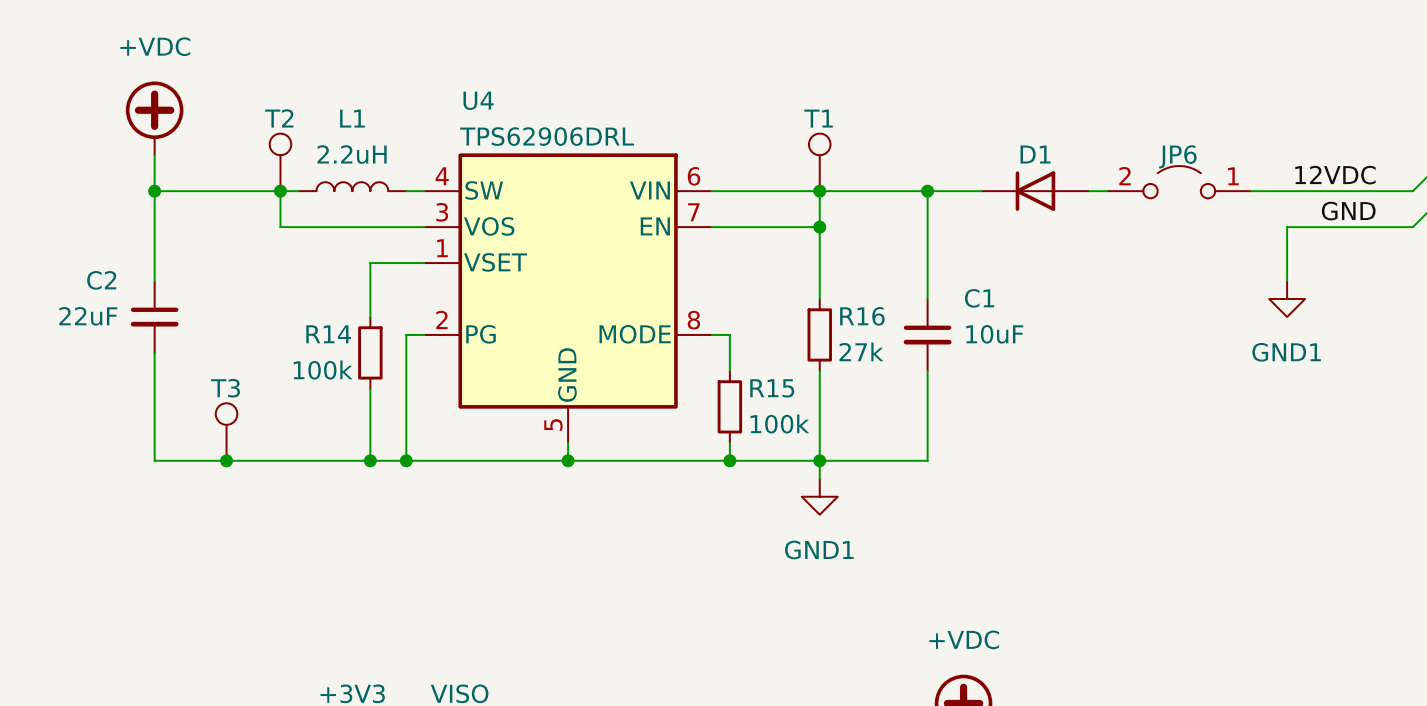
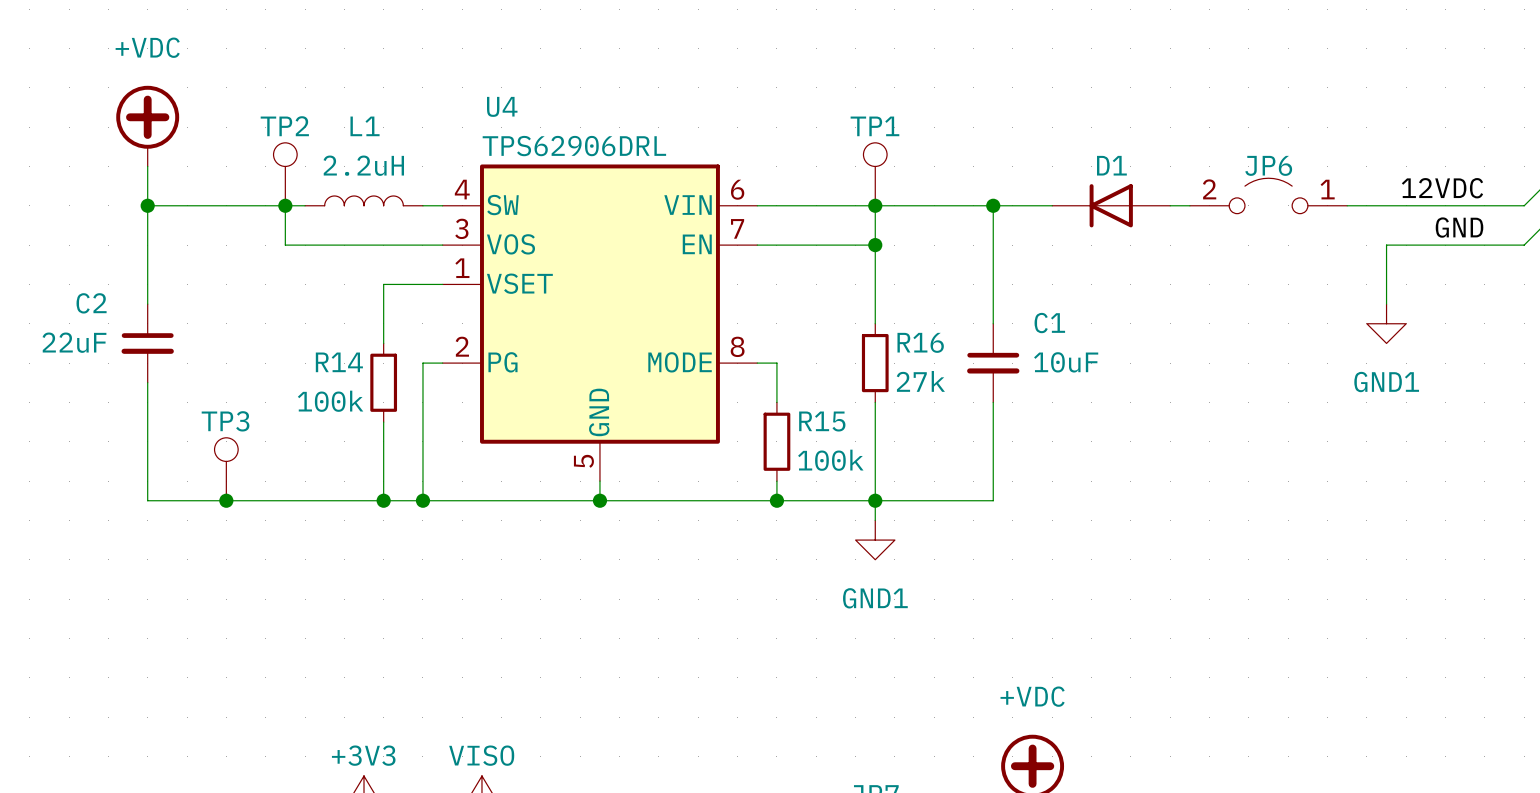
T2 name: T2 (279, 118) -> TP2 (284, 126)
T1 name: T1 (818, 118) -> TP1 (874, 126)
T3 name: T3 (225, 388) -> TP3 (225, 421)

